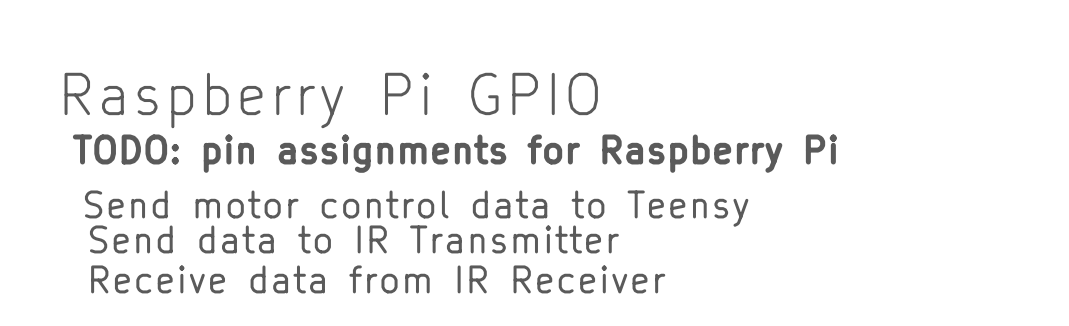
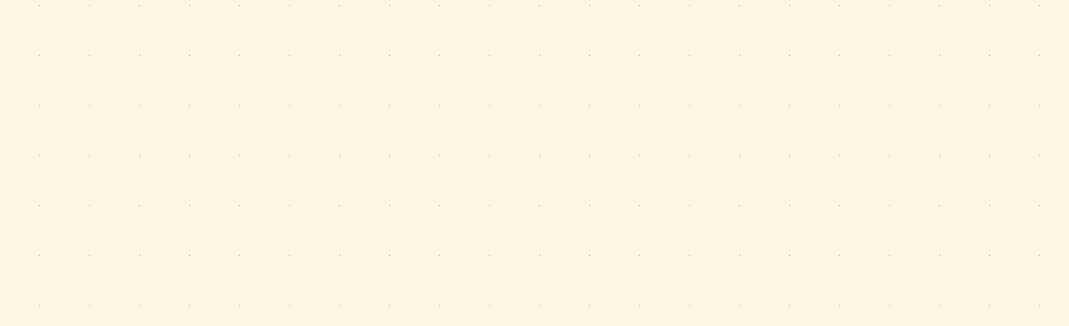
text: Raspberry Pi GPIO (331, 100) -> none
text: TODO: pin assignments for Raspberry Pi (454, 153) -> none
text: Send motor control data to Teensy (416, 208) -> none
text: Send data to IR Transmitter (354, 239) -> none
text: Receive data from IR Receiver (378, 279) -> none

